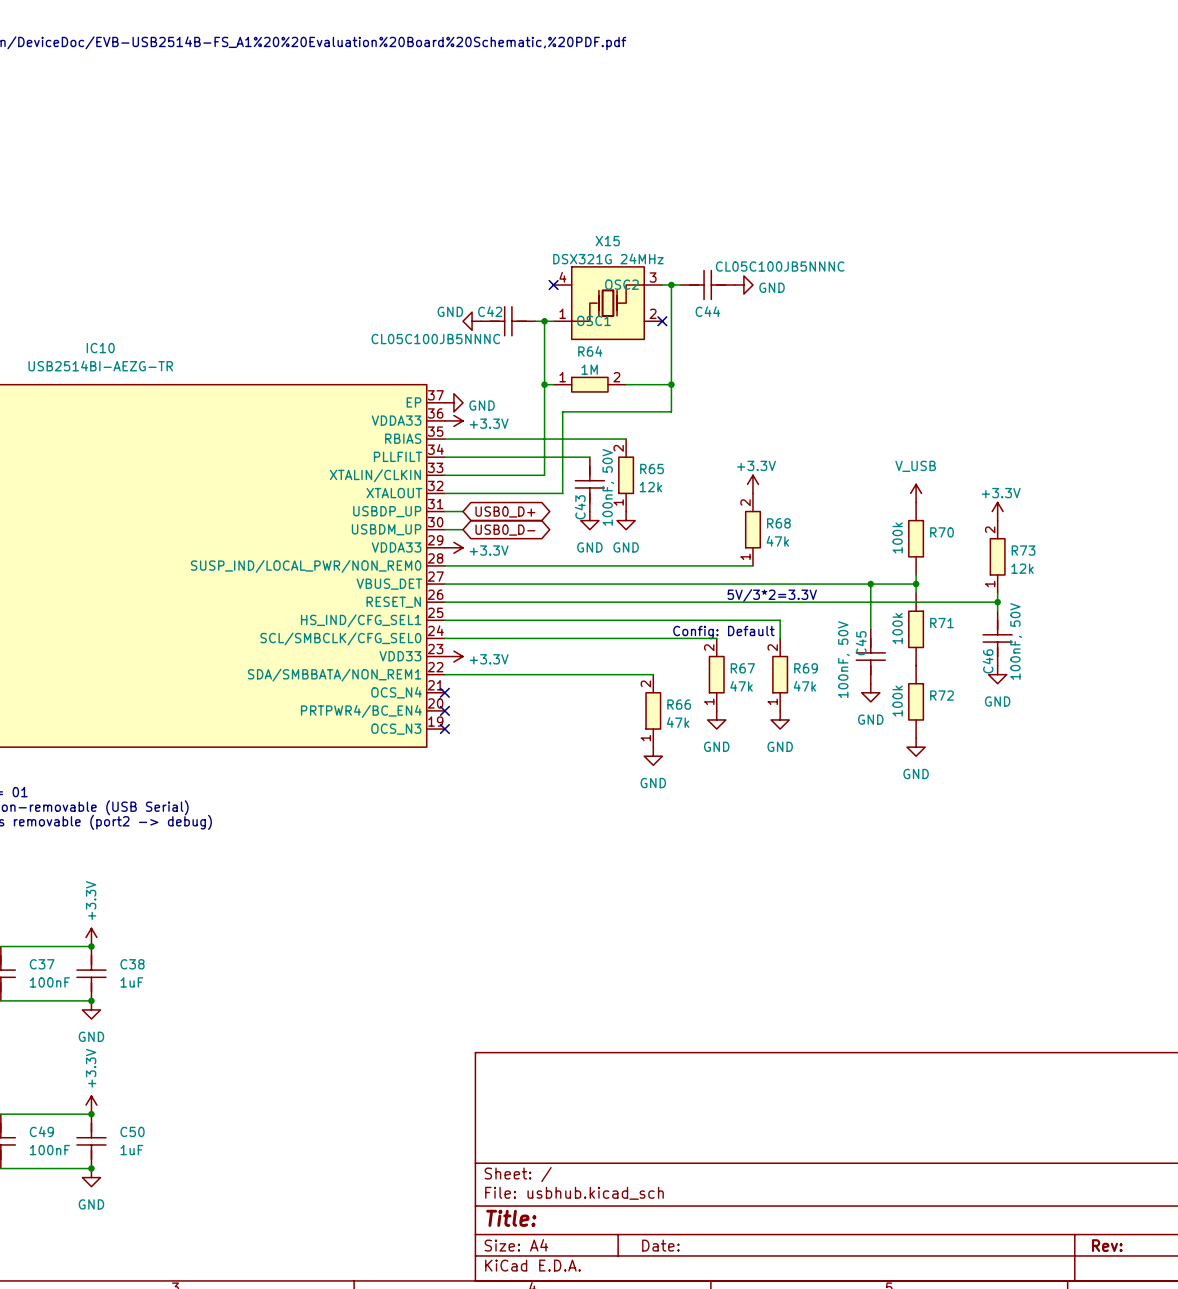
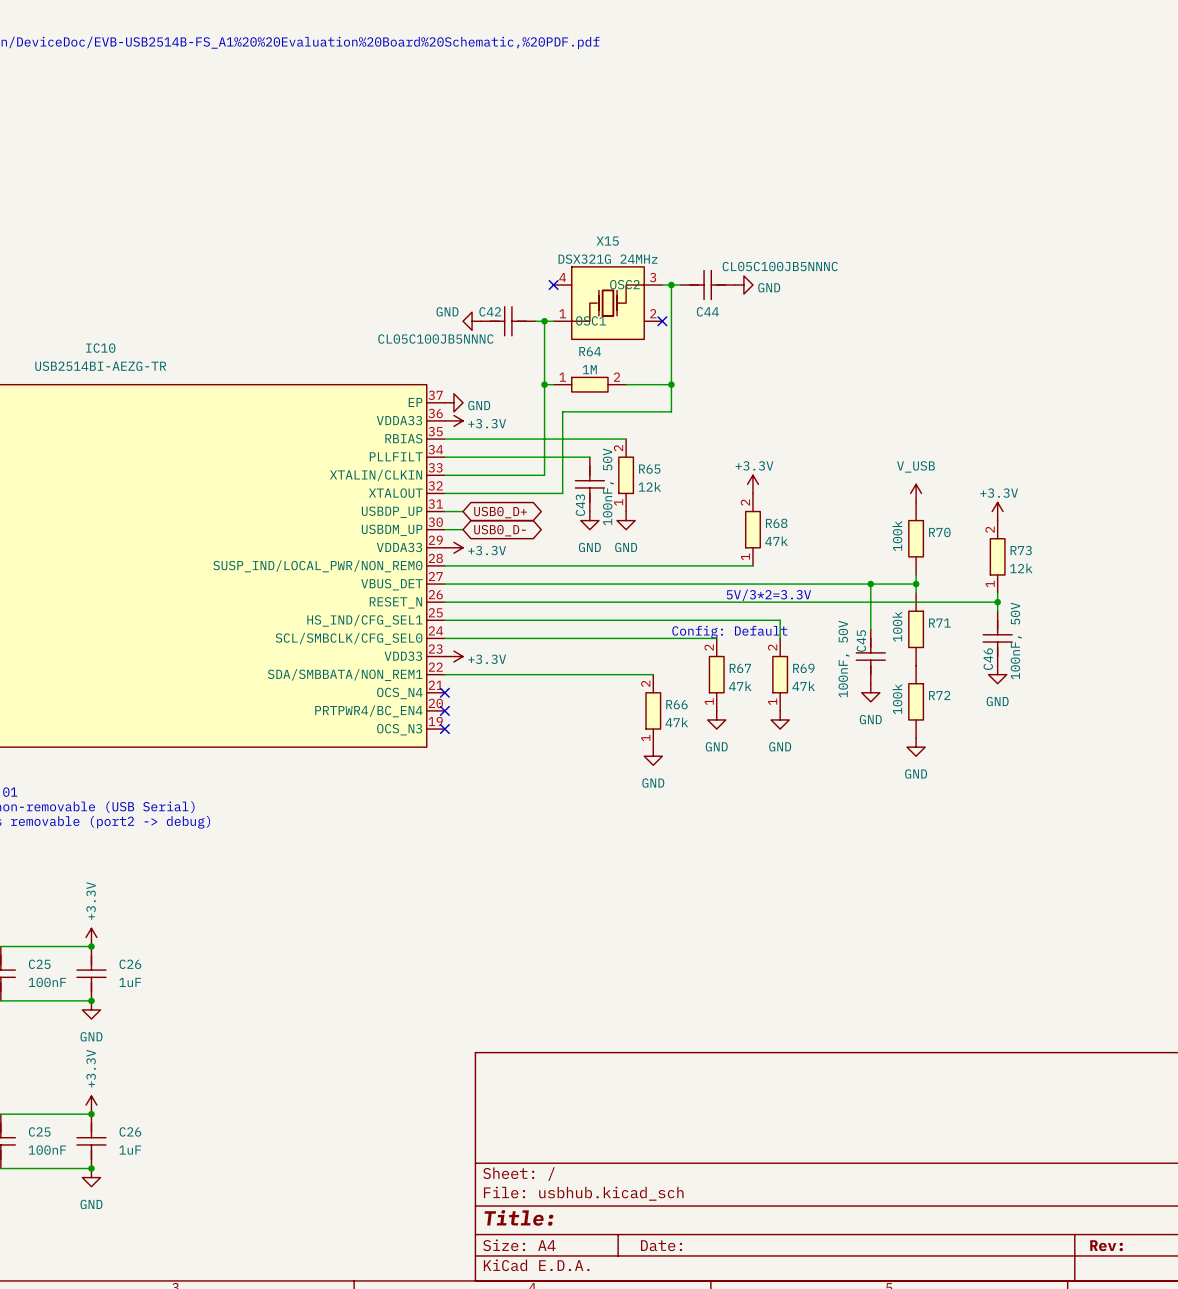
C37 name: C37 (42, 964) -> C25 (39, 964)
C38 name: C38 (132, 964) -> C26 (130, 964)
C49 name: C49 (41, 1131) -> C25 (39, 1131)
C50 name: C50 (132, 1131) -> C26 (130, 1131)

